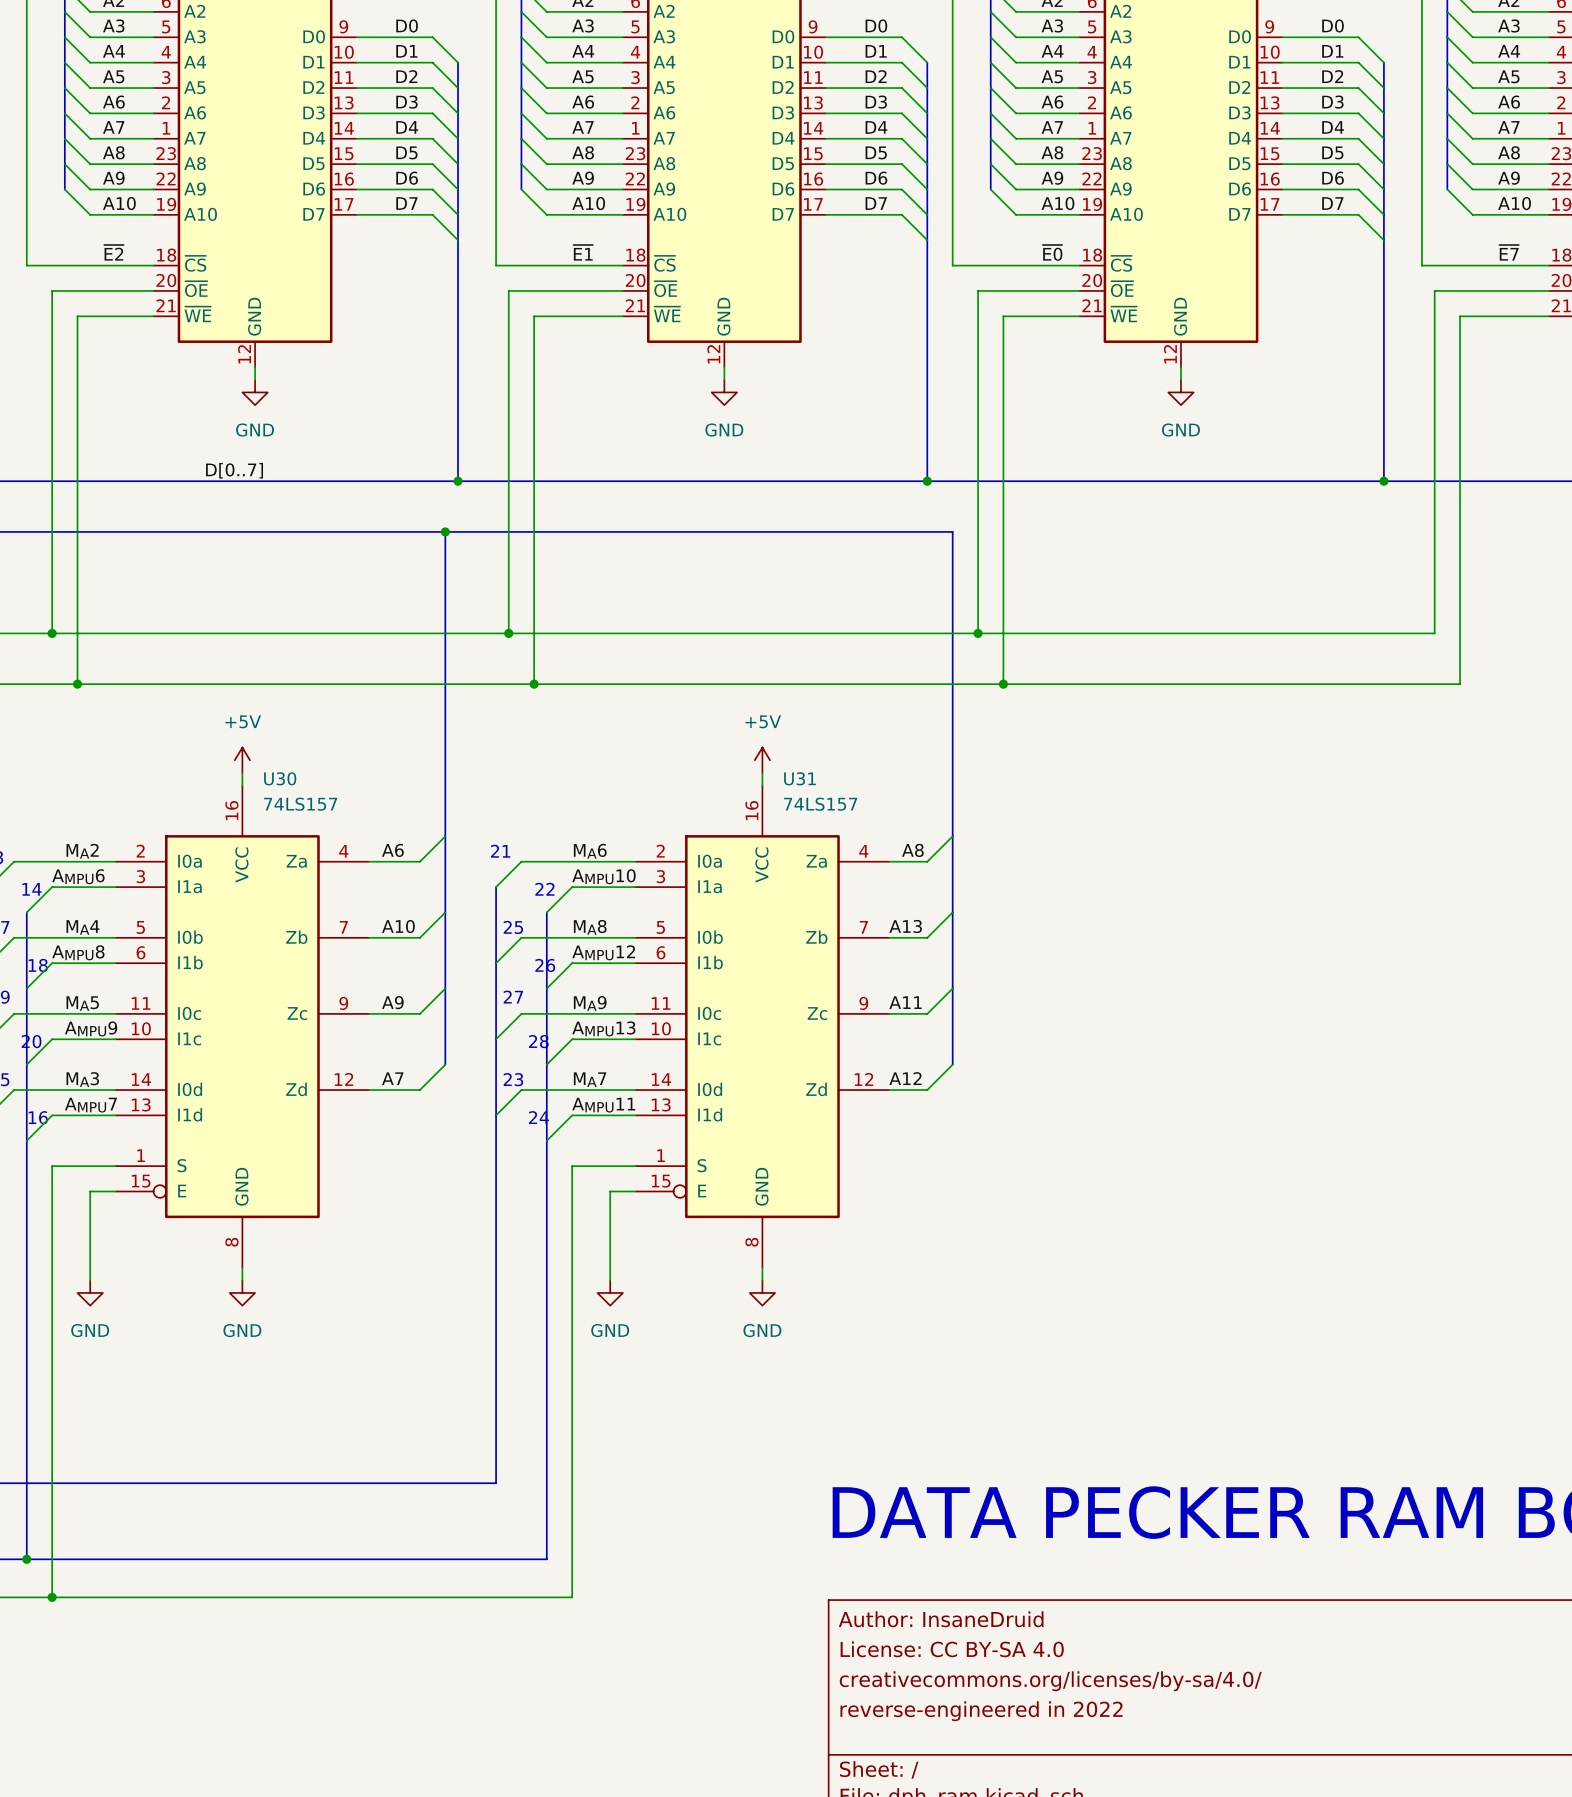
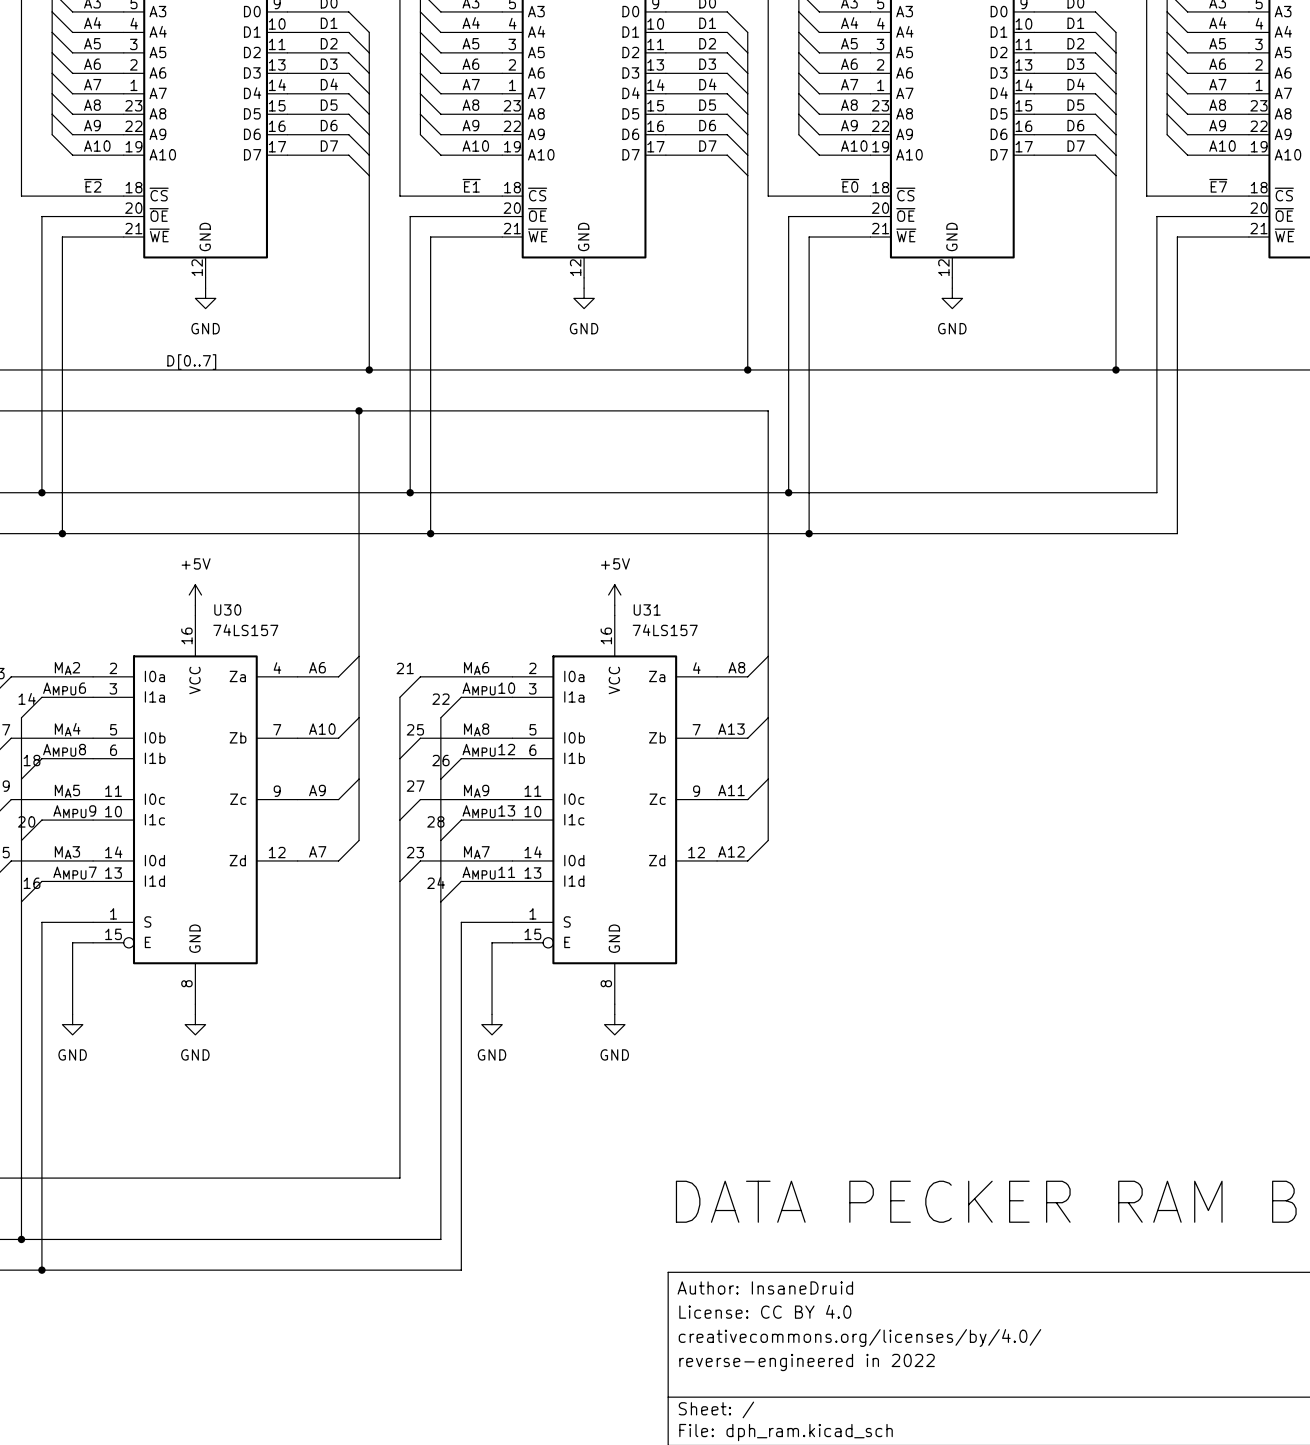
title block: License: CC BY-SA 4.0 (952, 1649) -> License: CC BY 4.0 (765, 1311)
title block: creativecommons.org/licenses/by-sa/4.0/ (1050, 1681) -> creativecommons.org/licenses/by/4.0/ (859, 1338)

